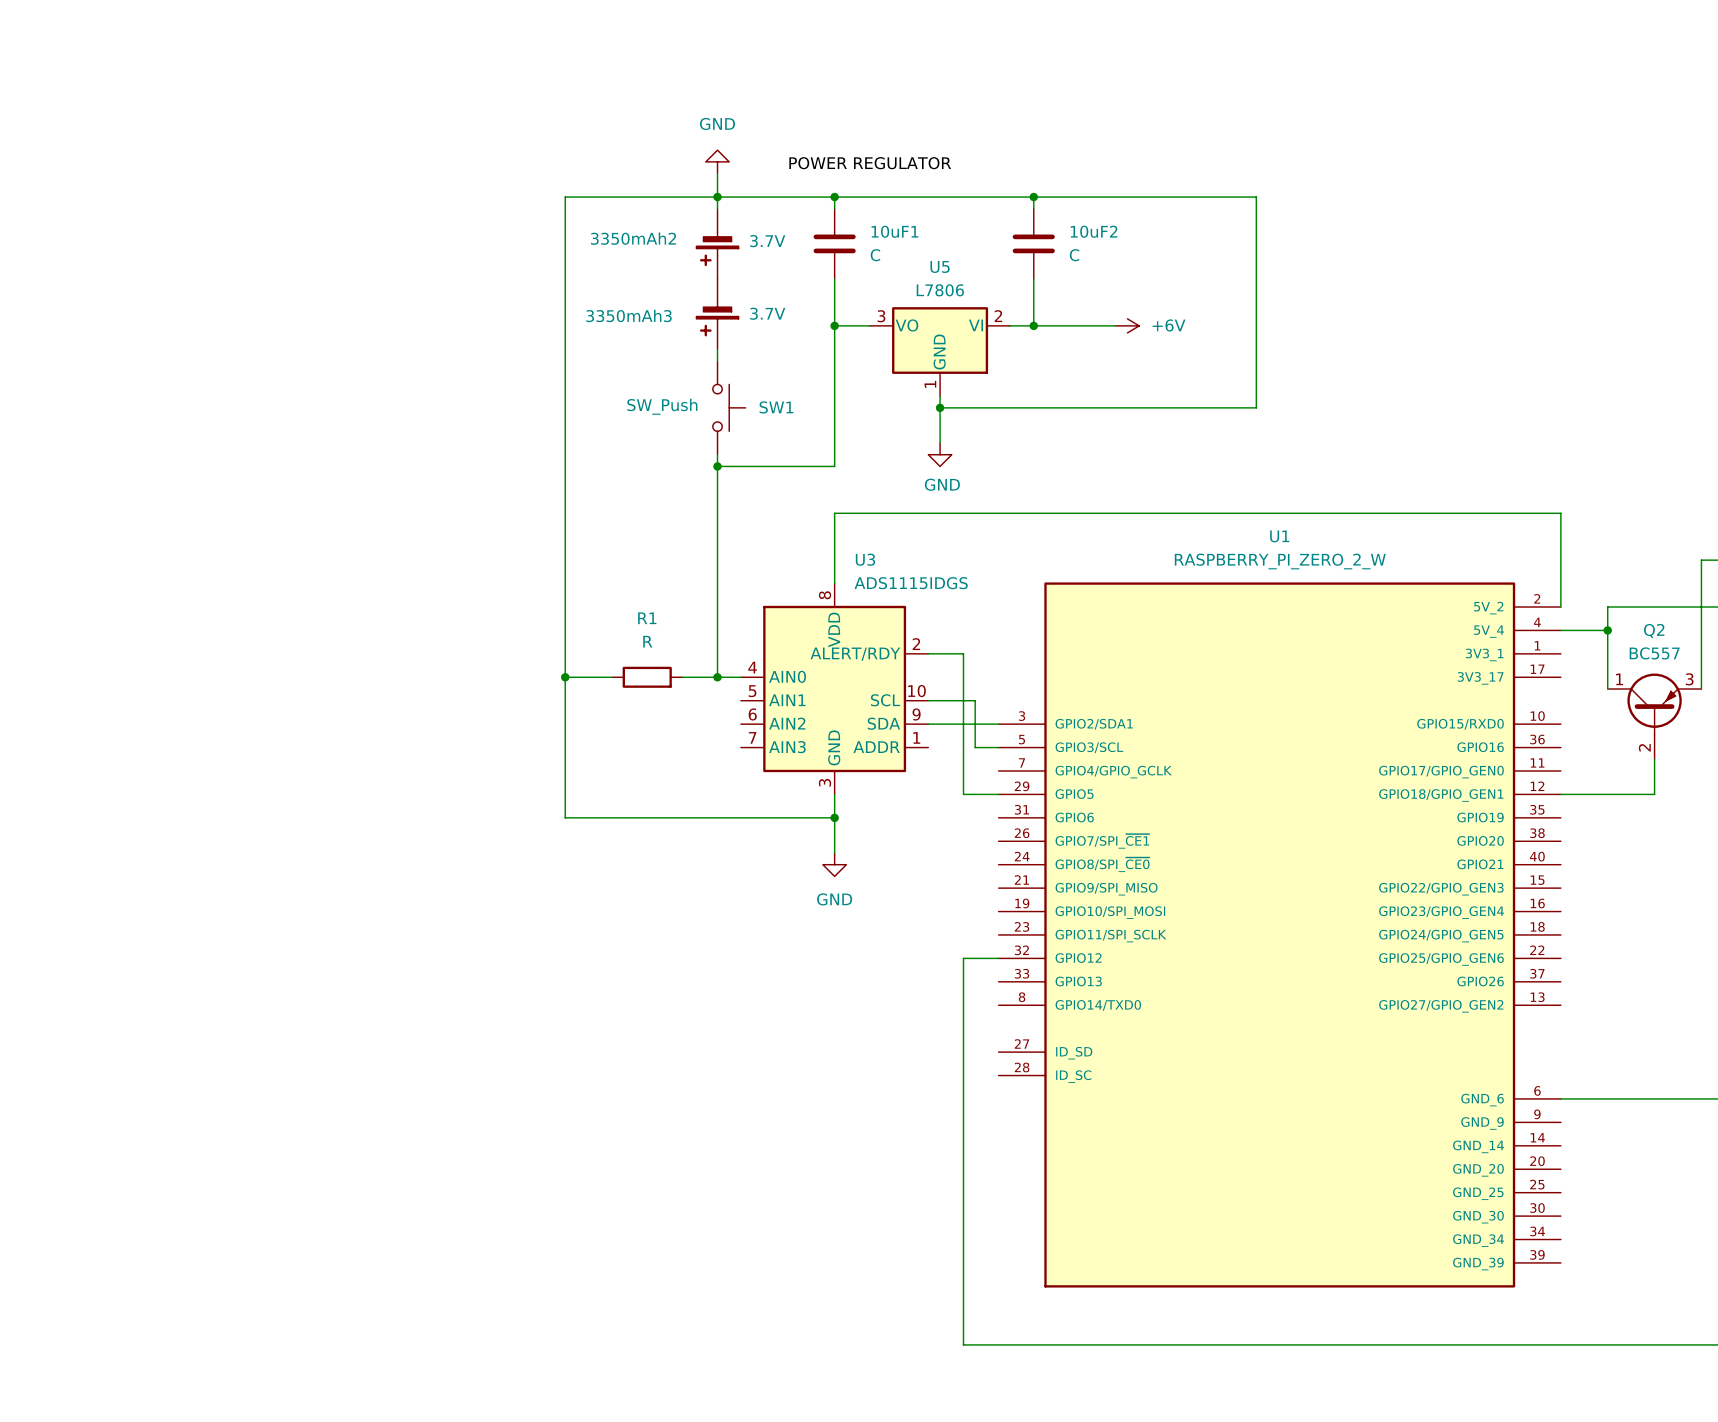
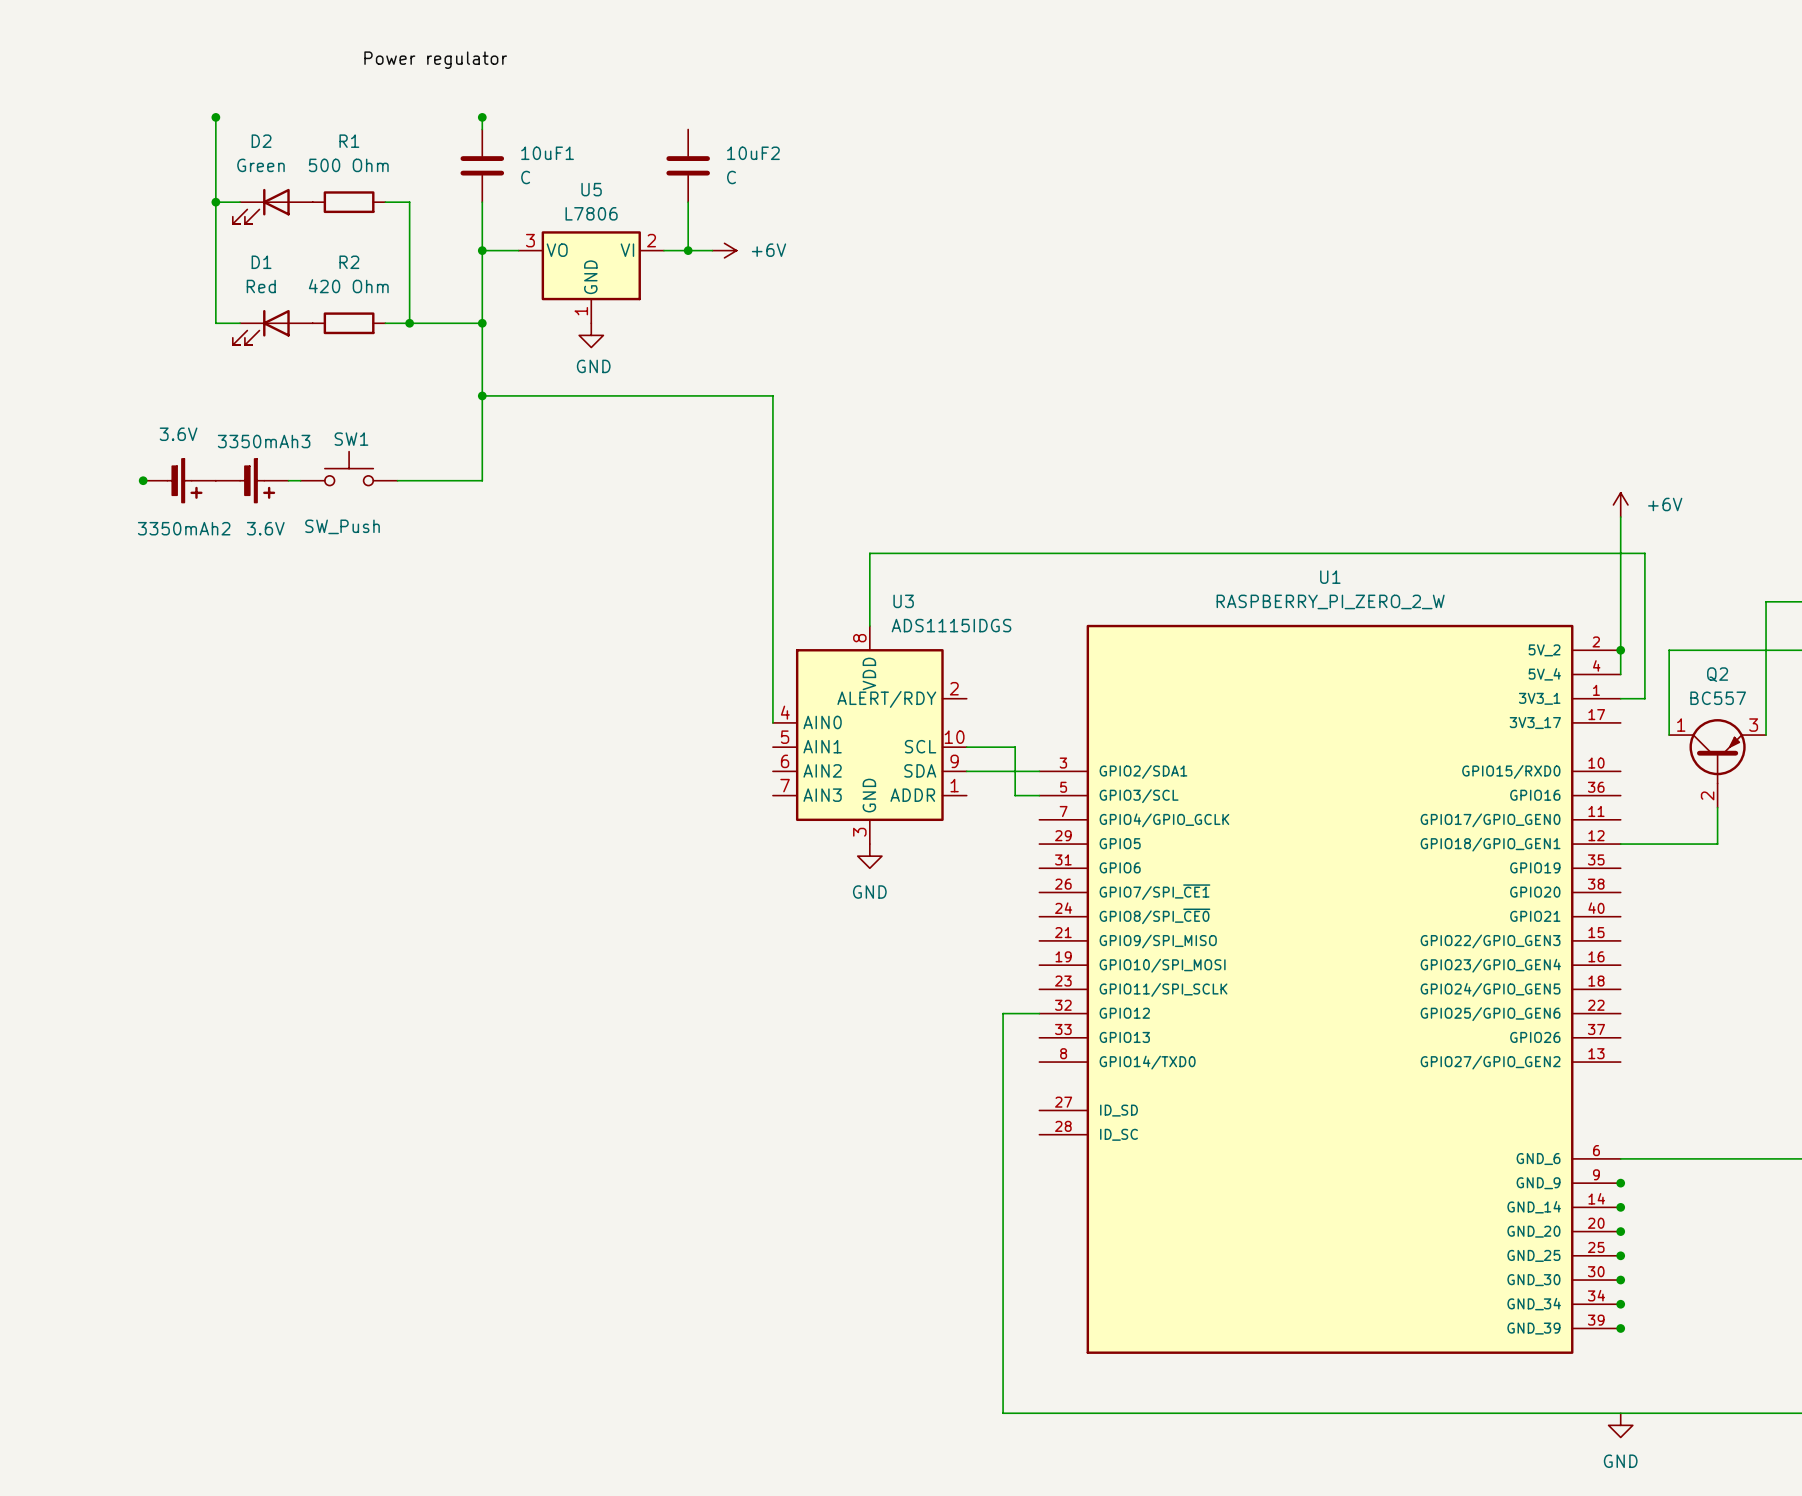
label: none -> Power regulator (435, 60)
wire: none -> (215, 117) (215, 323) (240, 323)
junction: none -> (215, 117)
wire: none -> (482, 117) (482, 129)
junction: none -> (482, 117)
power symbol: GND (717, 161) -> none
label: POWER REGULATOR (870, 163) -> none
wire: none -> (215, 202) (240, 202)
junction: none -> (215, 202)
wire: none -> (385, 202) (409, 202) (409, 323)
wire: none -> (482, 202) (482, 480) (397, 480)
wire: none -> (688, 202) (688, 250)
wire: (717, 173) (717, 208) -> none
D2: none -> Green (272, 206)
junction: (717, 197) -> none
wire: (834, 197) (834, 208) -> none
junction: (834, 197) -> none
wire: (1033, 197) (1033, 208) -> none
junction: (1033, 197) -> none
wire: none -> (482, 250) (518, 250)
junction: none -> (482, 250)
wire: none -> (663, 250) (712, 250)
junction: none -> (688, 250)
power symbol: none -> +6V (724, 250)
3350mAh2 name position: 3350mAh2 (633, 238) -> 3350mAh2 (184, 528)
3350mAh2 value: 3.7V (767, 241) -> 3.6V (178, 434)
3350mAh2 position: (717, 243) -> (179, 480)
10uF1 position: (834, 243) -> (482, 165)
10uF2 position: (1033, 243) -> (688, 165)
3350mAh2 rotation: 0° (717, 249) -> 90° counterclockwise (184, 480)
wire: (834, 279) (834, 466) (717, 466) -> none
wire: (1033, 279) (1033, 325) -> none
R2: none -> 420 Ohm (349, 323)
wire: none -> (385, 323) (482, 323)
junction: none -> (409, 323)
junction: none -> (482, 323)
D1: none -> Red (272, 327)
power symbol: none -> GND (591, 335)
3350mAh3 value: 3.7V (767, 313) -> 3.6V (265, 528)
3350mAh3 position: (717, 314) -> (252, 480)
3350mAh3 name position: 3350mAh3 (629, 315) -> 3350mAh3 (264, 441)
3350mAh3 rotation: 0° (717, 319) -> 90° counterclockwise (257, 480)
wire: (834, 325) (869, 325) -> none
junction: (834, 325) -> none
wire: (1010, 325) (1115, 325) -> none
junction: (1033, 325) -> none
power symbol: +6V (1127, 325) -> none
wire: (717, 349) (717, 361) -> none
U5 position: (940, 351) -> (591, 277)
junction: none -> (482, 395)
wire: (940, 396) (940, 443) -> none
SW1 value position: SW_Push (662, 406) -> SW_Push (342, 526)
SW1 rotation: 0° (729, 407) -> 90° counterclockwise (349, 468)
SW1 position: (729, 407) -> (349, 468)
wire: (940, 407) (1256, 407) (1256, 197) (565, 197) (565, 817) (834, 817) -> none
junction: (940, 407) -> none
junction: none -> (143, 480)
wire: none -> (288, 480) (300, 480)
wire: (717, 454) (717, 677) -> none
power symbol: GND (940, 454) -> none
junction: (717, 466) -> none
power symbol: none -> +6V (1620, 504)
wire: none -> (1620, 517) (1620, 553) (1644, 553) (1644, 698) (1620, 698)
wire: (1560, 630) (1607, 630) -> (1620, 674) (1620, 650)
junction position: (1607, 630) -> (1620, 650)
R1 value: R (647, 641) -> 500 Ohm (348, 165)
wire: (928, 653) (963, 653) (963, 794) (998, 794) -> none
wire: (565, 677) (612, 677) -> none
junction: (565, 677) -> none
R1 position: (647, 677) -> (349, 202)
wire: (682, 677) (740, 677) -> (482, 395) (772, 395) (772, 722)
junction: (717, 677) -> none
wire: (834, 794) (834, 852) -> none
junction: (834, 817) -> none
power symbol position: GND (834, 864) -> GND (869, 856)
junction: none -> (1620, 1183)
junction: none -> (1620, 1207)
junction: none -> (1620, 1231)
junction: none -> (1620, 1255)
junction: none -> (1620, 1280)
junction: none -> (1620, 1304)
junction: none -> (1620, 1328)
power symbol: none -> GND (1620, 1425)

